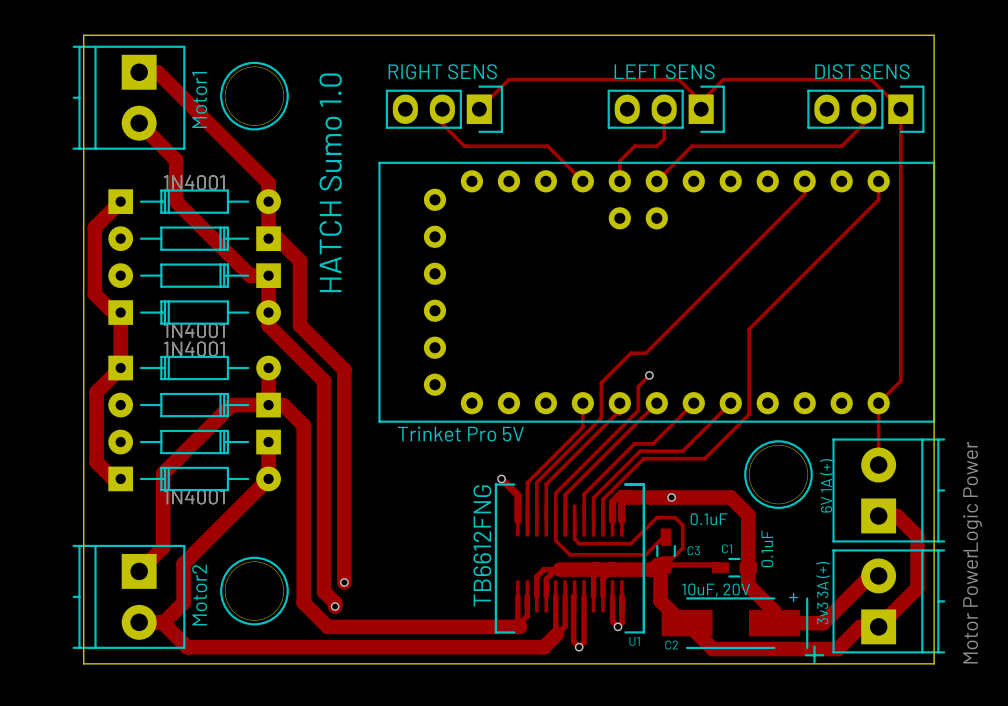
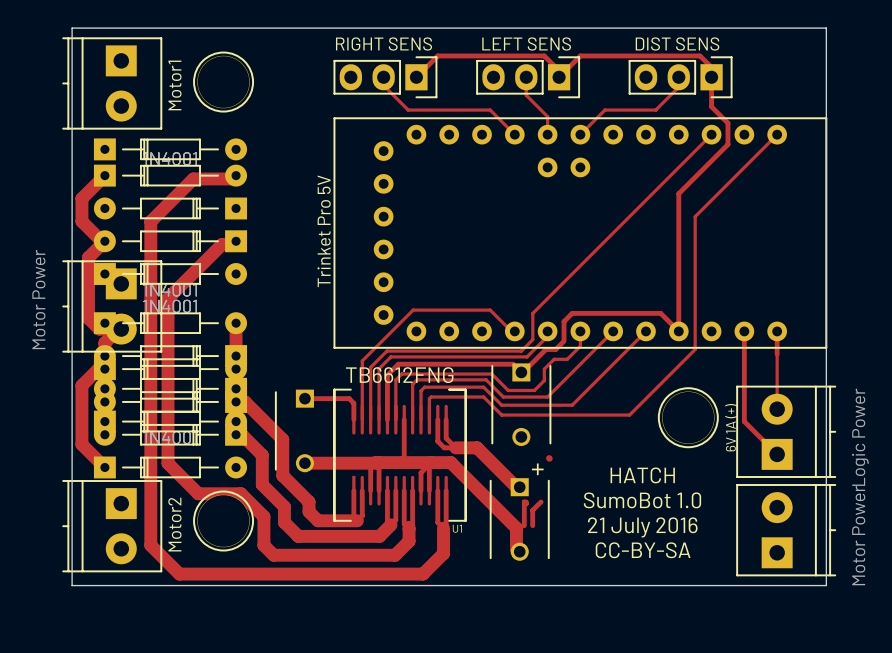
track: (139, 72) (157, 72) (268, 183) (268, 238) (277, 238) (300, 260) (300, 325) (344, 369) (344, 582) -> none
track: none -> (383, 77) (383, 85) (408, 110) (490, 110) (514, 134)
track: none -> (526, 77) (526, 95) (547, 116) (547, 134)
track: none -> (678, 77) (678, 87) (655, 110) (604, 110) (580, 134) (580, 126)
track: (701, 101) (723, 79) (871, 79) (900, 109) (900, 380) (878, 403) -> (777, 331) (777, 354)
track: (701, 101) (678, 79) (508, 79) (479, 109) -> none
track: (442, 109) (442, 124) (464, 146) (547, 146) (582, 181) -> none
part position: (444, 109) -> (385, 77)
track: (664, 109) (664, 138) (656, 146) (634, 146) (619, 160) (619, 181) -> none
part position: (666, 109) -> (528, 77)
track: (863, 109) (863, 124) (841, 146) (691, 146) (656, 181) -> none
part position: (865, 109) -> (680, 77)
track: (139, 123) (176, 160) (176, 201) (250, 275) (268, 275) (268, 325) (324, 380) (324, 591) (335, 602) (335, 606) -> none
track: none -> (711, 134) (532, 313) (532, 339) (521, 351) (386, 351) (370, 367) (370, 419)
track: none -> (777, 134) (695, 216) (695, 349) (629, 415) (501, 415) (483, 397) (431, 397) (429, 398) (429, 419)
part: none -> (170, 149)
track: (804, 181) (804, 194) (645, 353) (630, 353) (601, 382) (601, 417) (536, 482) (536, 520) -> none
track: (878, 181) (878, 199) (749, 329) (749, 414) (704, 458) (643, 458) (603, 499) (603, 520) -> none
text: HATCH Sumo 1.0 (330, 182) -> none
track: none -> (236, 178) (193, 178) (150, 221) (150, 545) (179, 574) (422, 574) (443, 553) (443, 528)
track: (94, 253) (94, 294) (109, 308) (117, 308) (120, 312) (120, 368) (96, 392) (96, 462) (113, 478) (120, 478) -> (81, 221) (104, 244) (101, 244) (88, 257) (88, 318) (99, 329) (121, 329)
track: none -> (236, 244) (222, 244) (168, 298) (168, 463) (198, 493) (240, 493) (263, 516) (263, 545) (273, 555) (395, 555) (409, 541) (409, 527)
part position: (656, 292) -> (580, 233)
part: none -> Motor Power (112, 306)
track: none -> (118, 329) (104, 342) (104, 369) (98, 369) (81, 385) (81, 444) (104, 467)
track: (649, 375) (638, 386) -> (416, 77) (437, 55) (544, 55) (559, 70) (559, 77) (580, 55) (700, 55) (711, 67) (711, 106) (727, 123) (727, 144) (678, 193) (678, 331) (660, 313) (572, 313) (564, 321) (564, 339)
via: (649, 375) -> none
track: none -> (514, 331) (511, 331) (490, 310) (413, 310) (362, 360) (362, 419)
track: none -> (547, 331) (547, 336) (527, 356) (390, 356) (379, 368) (379, 419)
track: none -> (613, 331) (547, 397) (503, 397) (486, 379) (417, 379) (412, 384) (412, 419)
track: none -> (645, 331) (572, 405) (501, 405) (483, 387) (424, 387) (421, 390) (421, 419)
track: (638, 388) (638, 410) (616, 432) -> (580, 331) (580, 346) (567, 359) (554, 359) (544, 369) (544, 380)
track: none -> (564, 341) (555, 349) (545, 349) (523, 372) (513, 364) (398, 364) (387, 375) (387, 419)
track: (582, 403) (582, 427) (527, 482) (527, 520) -> none
track: (656, 403) (565, 494) (565, 520) -> none
track: (693, 403) (653, 443) (634, 443) (584, 494) (584, 520) -> none
track: (730, 403) (682, 451) (640, 451) (593, 497) (593, 520) -> none
track: (619, 414) (619, 403) (616, 406) (616, 414) (546, 484) (546, 520) -> none
part: none -> (170, 369)
part value rotation: 0° (460, 434) -> 90° counterclockwise (324, 231)
track: (268, 442) (268, 478) (183, 563) (183, 602) (164, 622) (139, 622) -> none
track: (605, 443) (555, 493) (555, 540) (569, 554) (645, 554) (663, 537) (666, 537) -> (534, 390) (508, 390) (491, 374) (401, 374) (395, 379) (395, 419)
track: none -> (304, 398) (349, 398) (353, 403) (353, 419)
part: none -> (170, 401)
track: none -> (236, 401) (245, 401) (282, 439) (282, 475) (309, 501) (309, 511) (318, 520) (357, 520)
part: none -> (521, 404)
track: none -> (404, 419) (403, 461)
track: none -> (437, 419) (437, 441) (444, 447) (462, 447)
track: none -> (446, 419) (446, 438) (455, 447) (477, 447) (516, 487) (519, 487)
track: (501, 478) (517, 495) (517, 520) -> none
via: (501, 478) -> none
U1 footprint: [494, 483, 645, 634] -> [333, 388, 467, 522]
part: none -> (304, 430)
part: none -> (170, 434)
track: none -> (236, 434) (241, 434) (262, 455) (262, 484) (284, 506) (284, 522) (298, 536) (379, 536) (391, 524)
track: (623, 497) (730, 497) (748, 514) (748, 585) (774, 611) (774, 623) (823, 623) (870, 575) (878, 575) -> none
via: (671, 497) -> none
track: (878, 515) (897, 515) (917, 536) (917, 588) (878, 626) -> (777, 454) (744, 421) (744, 331)
track: (574, 520) (574, 539) (579, 543) (630, 543) (656, 517) (675, 517) (682, 525) (682, 548) (666, 564) -> none
track: (621, 520) (621, 499) (627, 493) (620, 493) (612, 501) (612, 520) -> none
track: none -> (375, 462) (450, 462) (516, 528) (516, 548) (519, 551)
track: none -> (375, 462) (370, 467) (370, 490)
track: none -> (379, 462) (304, 463)
track: none -> (379, 462) (379, 490)
track: none -> (431, 462) (421, 472) (421, 490)
track: none -> (429, 464) (429, 490)
part: none -> (170, 467)
text: none -> + (537, 469)
text: none -> HATCH (642, 475)
U1 value position: TB6612FNG (482, 545) -> TB6612FNG (399, 375)
C3: 0.1uF (666, 551) -> none
track: none -> (353, 490) (353, 517) (357, 520)
track: none -> (362, 490) (362, 515) (357, 520)
track: none -> (387, 490) (387, 521) (391, 524)
track: none -> (395, 490) (395, 520) (391, 524)
track: none -> (404, 490) (404, 524) (409, 529) (412, 525) (412, 490)
track: none -> (437, 490) (437, 522) (443, 528)
track: none -> (446, 490) (446, 525) (443, 528)
track: (660, 564) (660, 600) (682, 623) (687, 623) (712, 649) (837, 649) (860, 626) (878, 626) -> none
track: (666, 564) (657, 564) (653, 569) (544, 569) (536, 576) (536, 596) -> none
track: (666, 564) (717, 564) (720, 567) -> none
text: none -> SumoBot 1.0 (642, 500)
C1: 0.1uF (734, 567) -> none
track: (556, 569) (546, 579) (546, 596) -> none
track: (139, 571) (163, 547) (163, 473) (231, 405) (283, 405) (303, 425) (303, 602) (327, 626) (520, 626) (520, 623) (527, 615) (527, 596) -> none
via: (344, 582) -> none
part: none -> (519, 519)
text: 3v3 3A (+) (823, 593) -> none
track: (517, 596) (517, 626) (516, 626) -> none
track: (555, 596) (555, 635) (565, 626) (565, 596) -> none
track: (574, 596) (573, 641) (579, 647) (584, 642) (584, 596) -> none
track: (612, 596) (612, 621) (617, 626) (621, 622) (621, 596) -> none
text: none -> 21 July 2016 (642, 527)
via: (335, 606) -> none
track: (162, 622) (187, 647) (544, 647) (556, 634) -> none
text: none -> CC-BY-SA (643, 550)
via: (617, 626) -> none
C2: 10uF, 20V (742, 630) -> none
via: (579, 647) -> none

